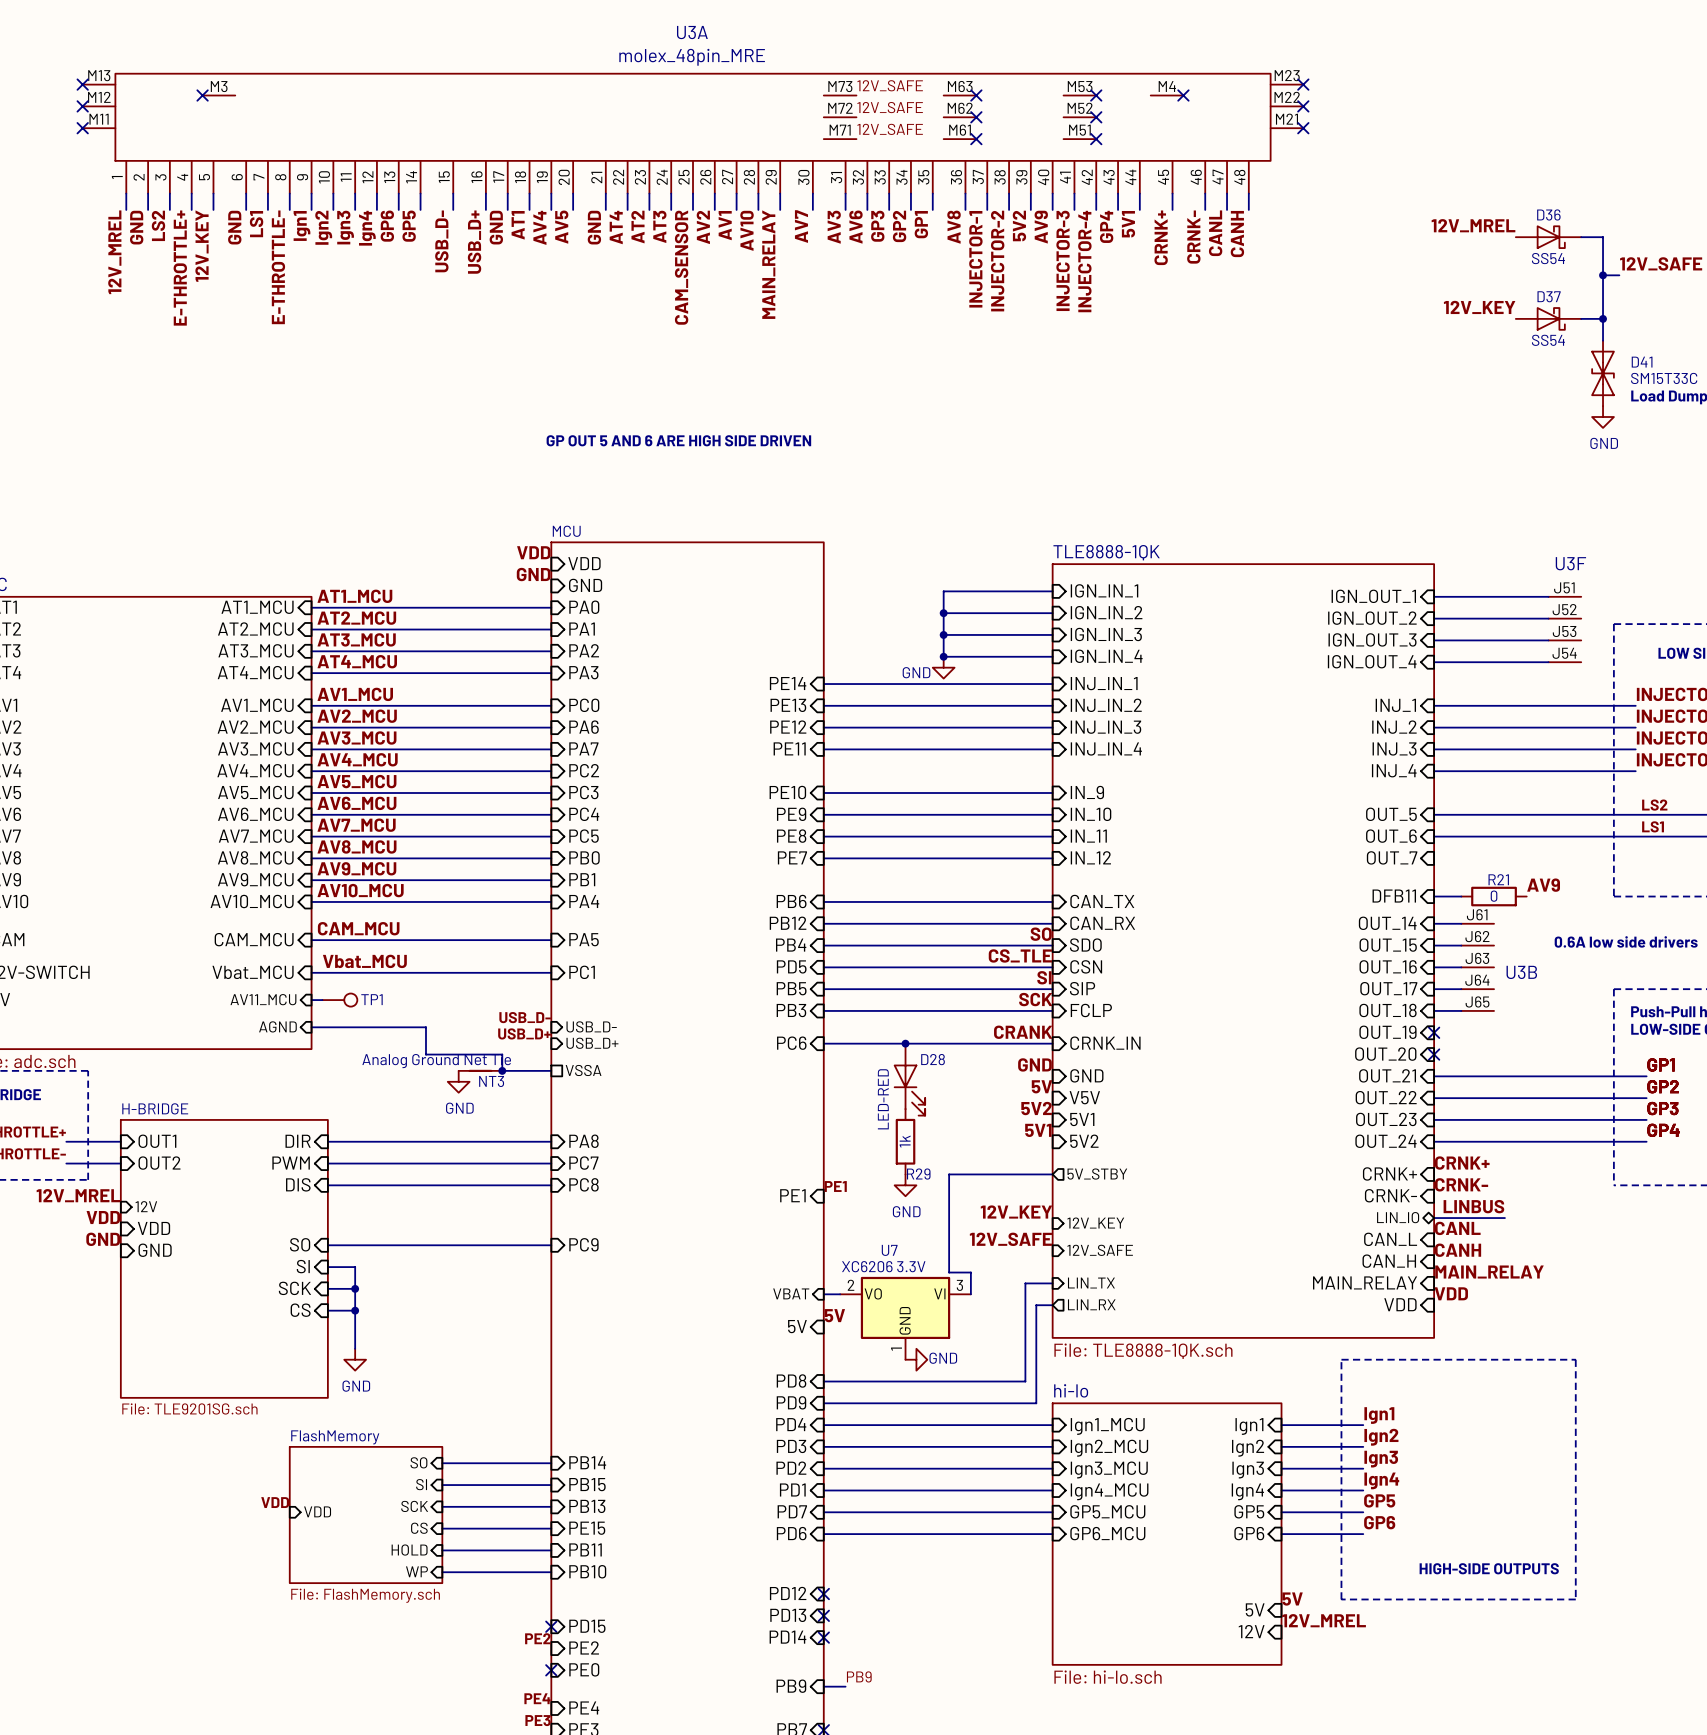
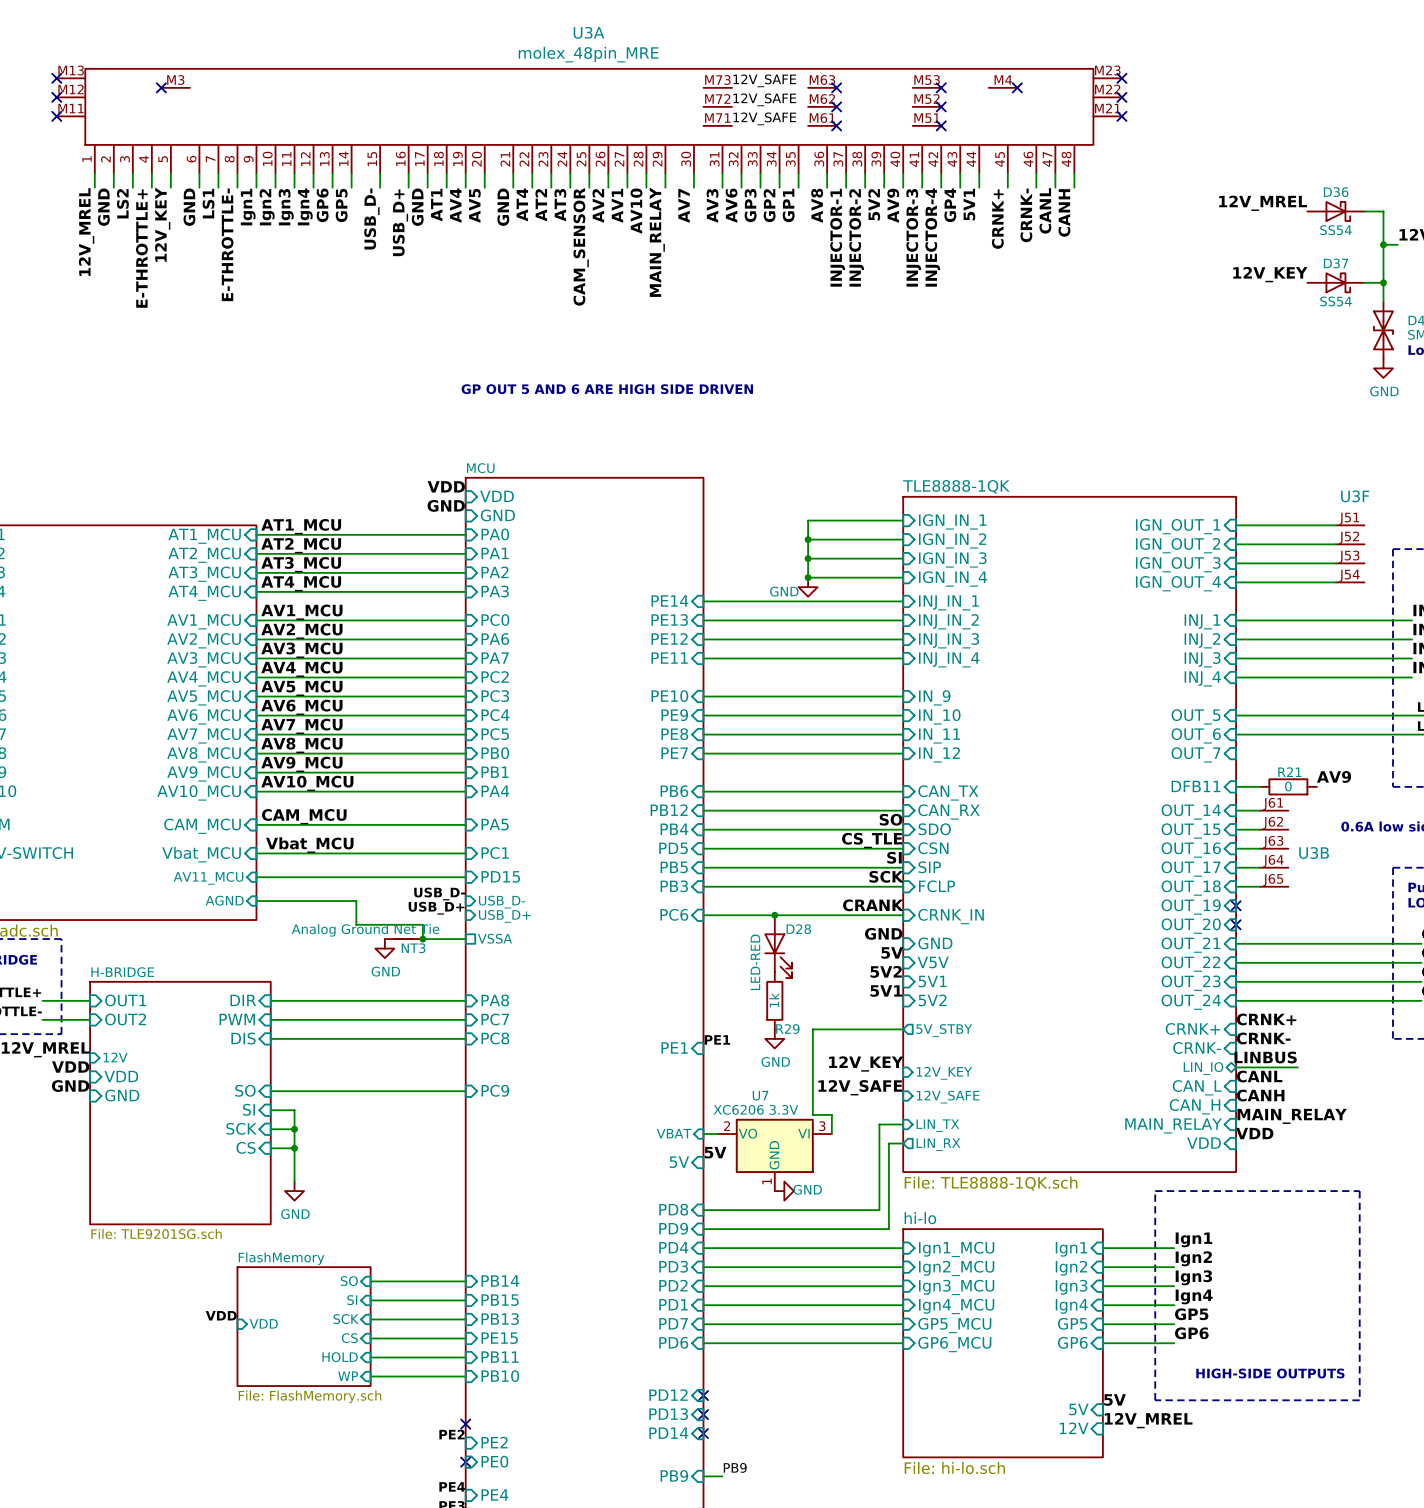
sheet pin: none -> PD15 (500, 876)
wire: none -> (266, 877) (465, 877)
TP1: (339, 1000) -> none
sheet pin: PD15 (587, 1626) -> none

